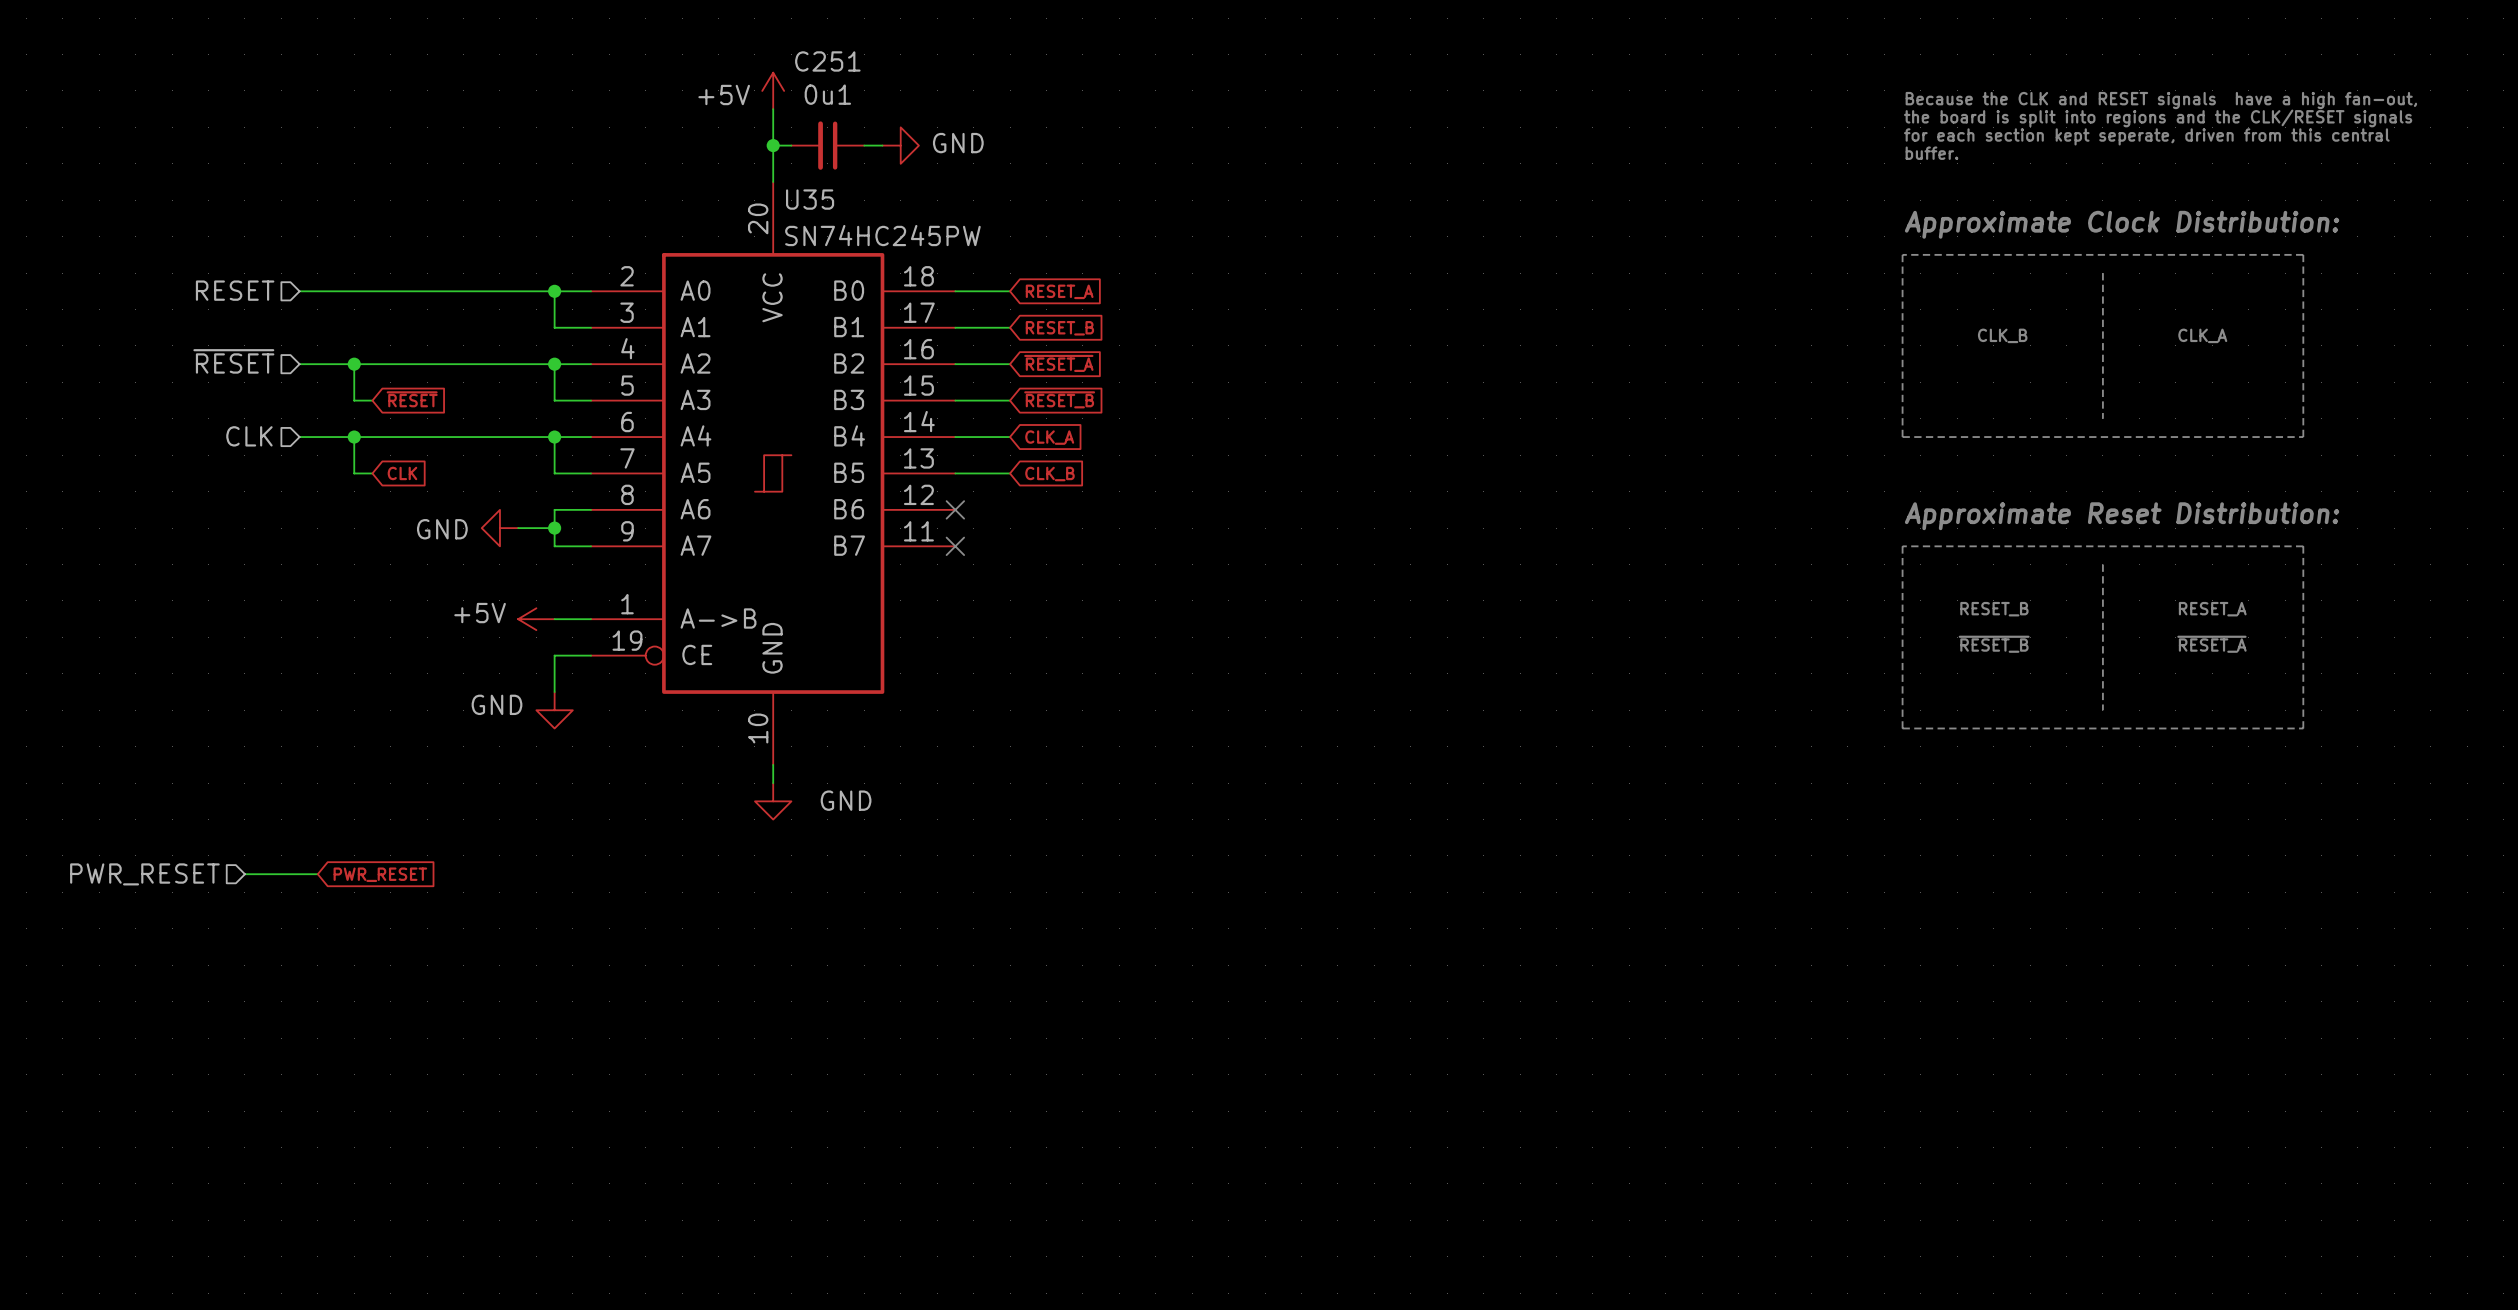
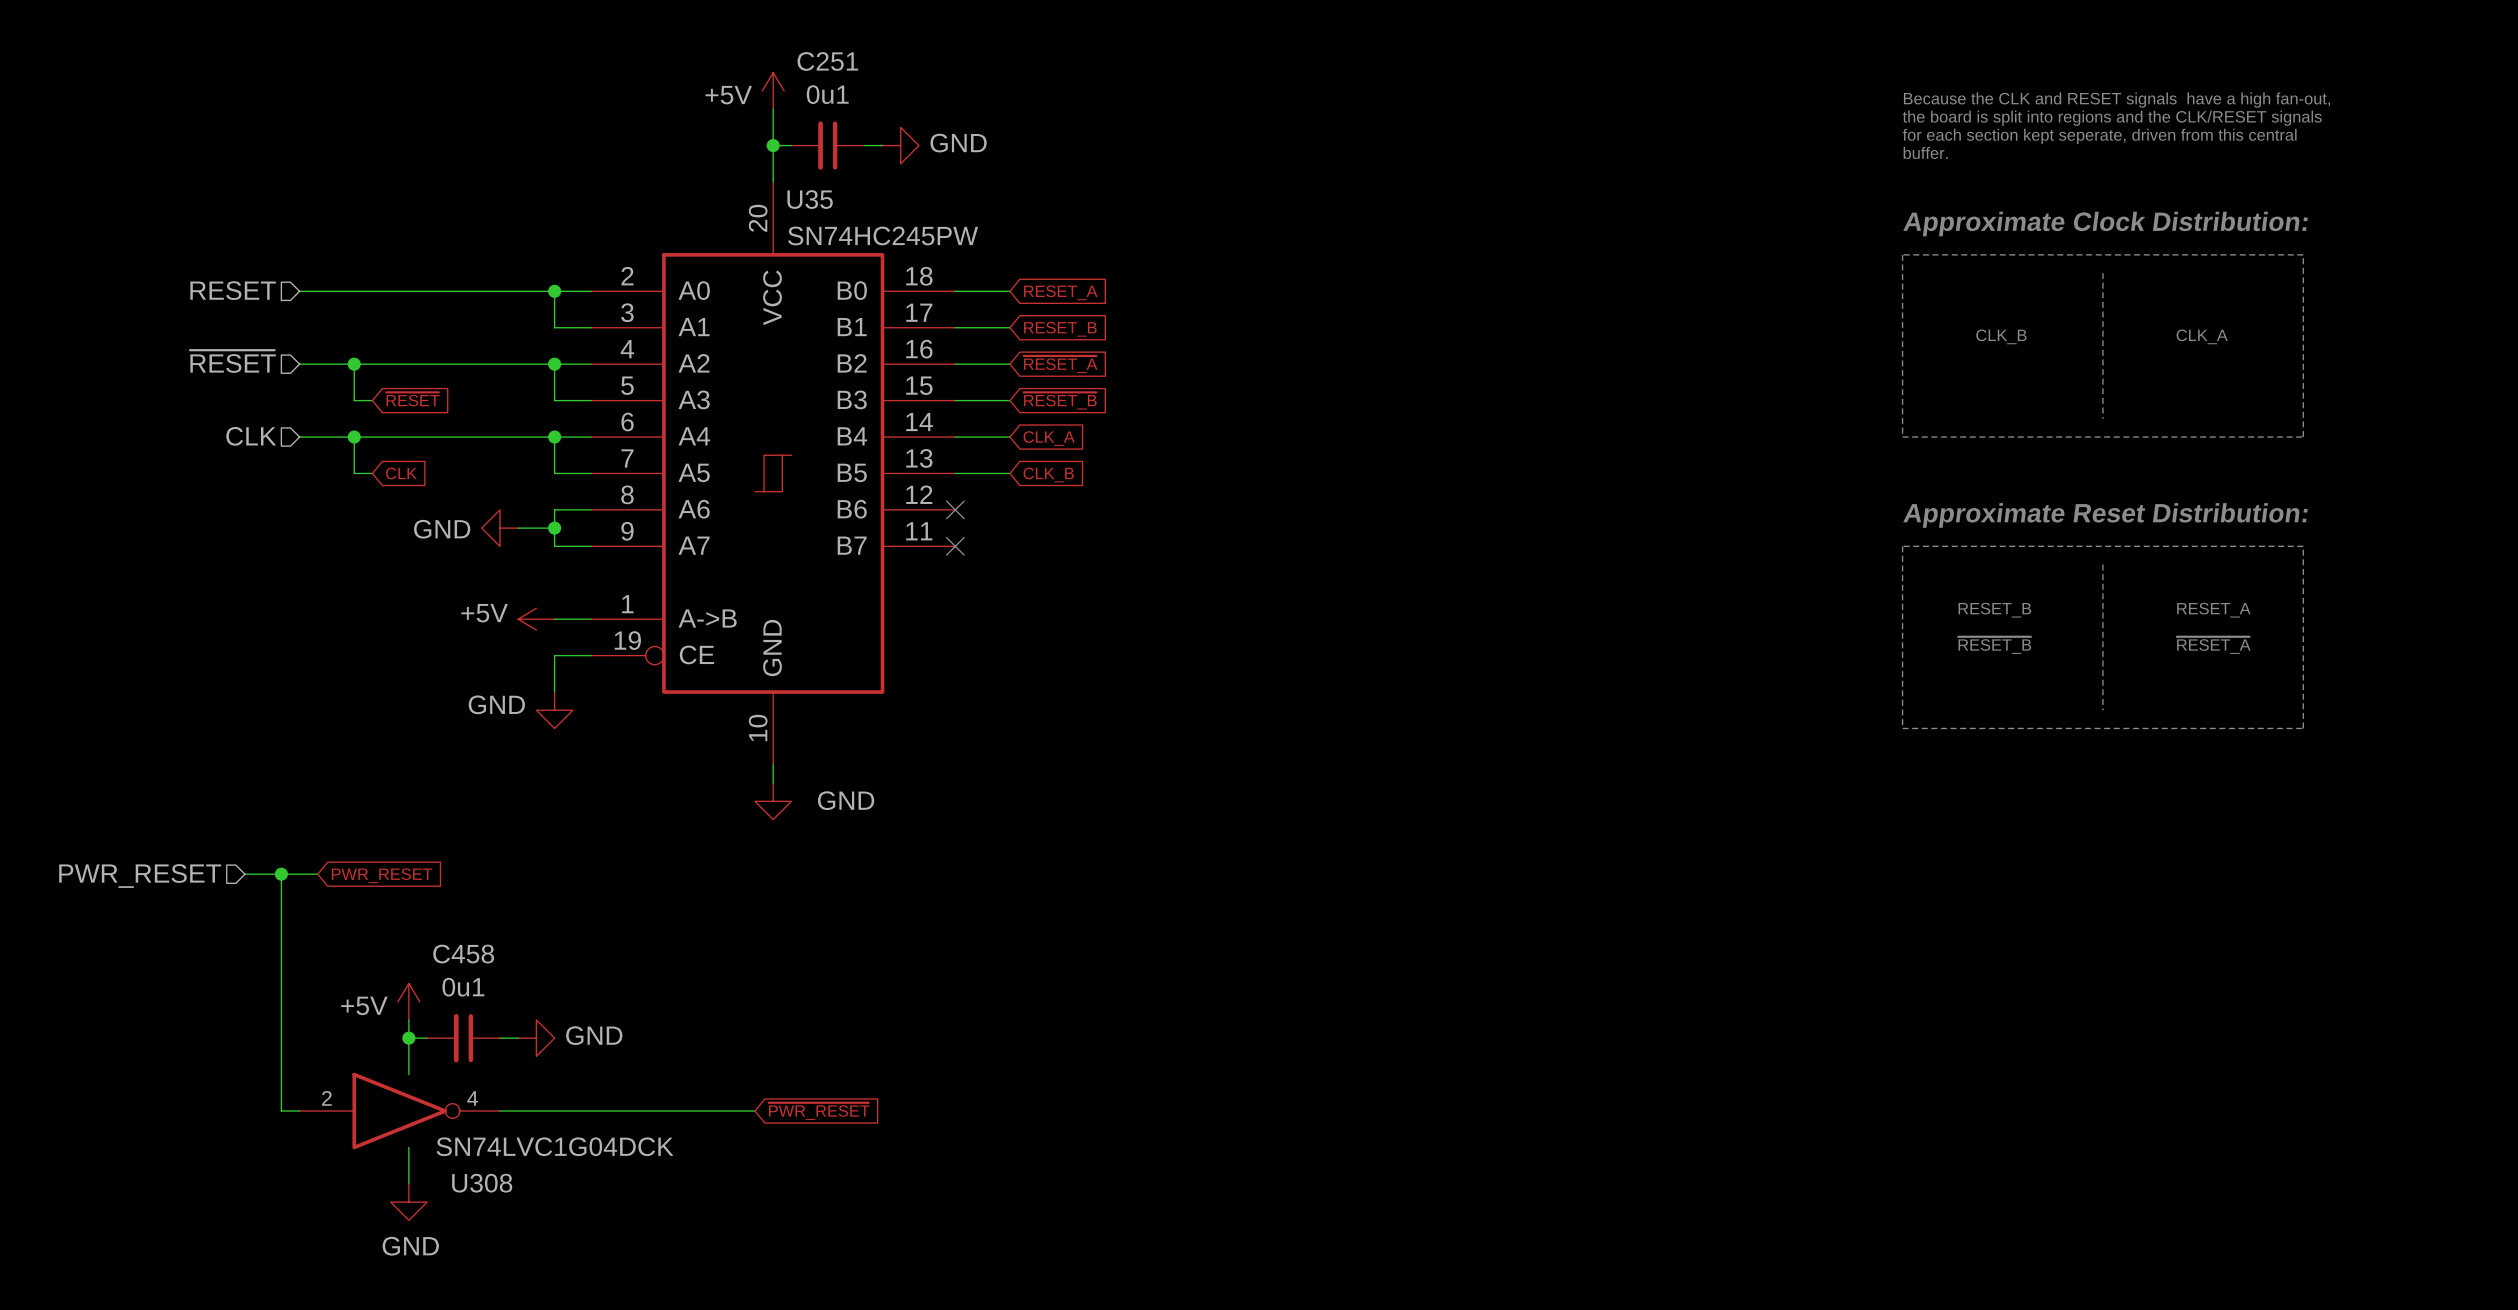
wire: none -> (281, 874) (281, 1111) (299, 1111)
junction: none -> (281, 874)
power symbol: none -> +5V (408, 1001)
wire: none -> (408, 1019) (408, 1074)
wire: none -> (408, 1038) (427, 1038)
junction: none -> (408, 1038)
C458: none -> 0u1 (463, 1038)
wire: none -> (499, 1038) (518, 1038)
power symbol: none -> GND (536, 1038)
global label: none -> ~{PWR_RESET} (819, 1111)
U308: none -> SN74LVC1G04DCK (399, 1111)
wire: none -> (499, 1111) (754, 1111)
wire: none -> (408, 1147) (408, 1183)
power symbol: none -> GND (408, 1202)

